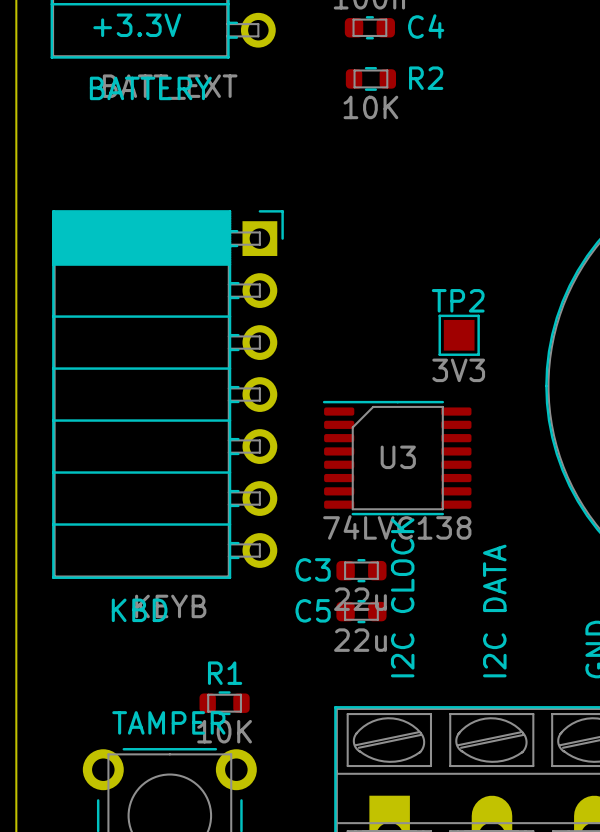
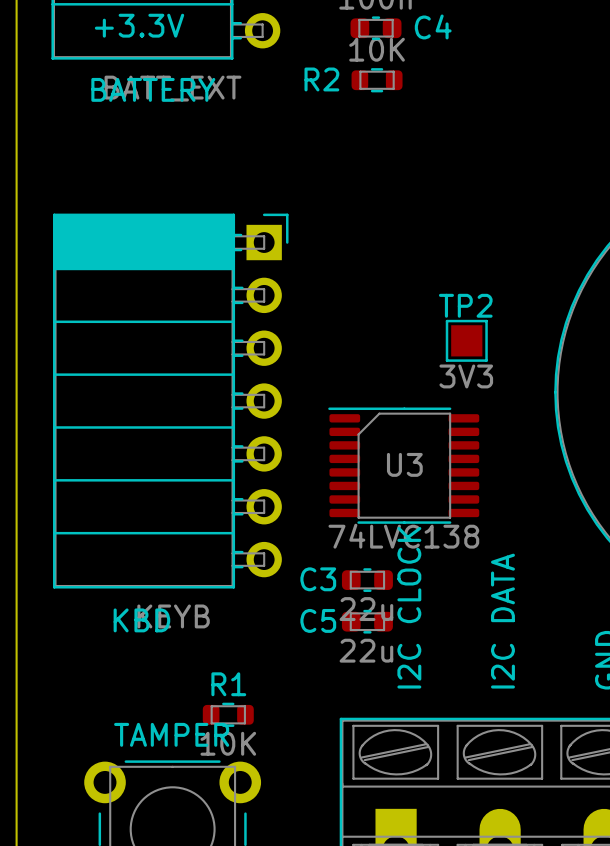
R2 name position: R2 (426, 78) -> R2 (321, 79)
R2 value position: 10K (370, 107) -> 10K (377, 49)

